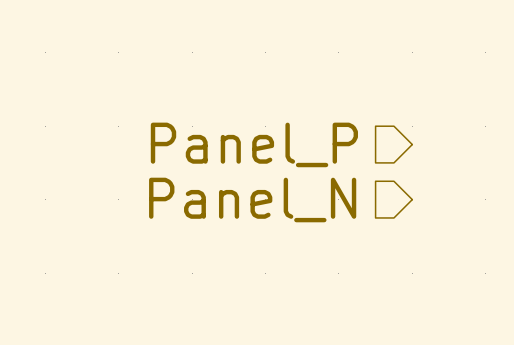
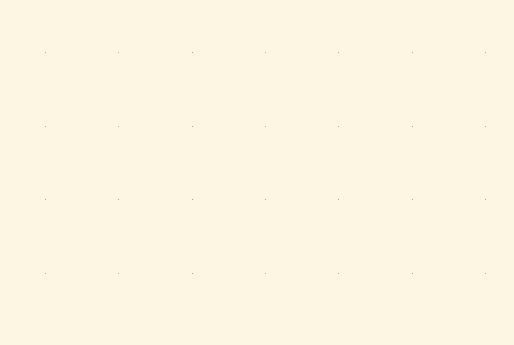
hierarchical label: Panel_P (254, 144) -> none
hierarchical label: Panel_N (252, 199) -> none

